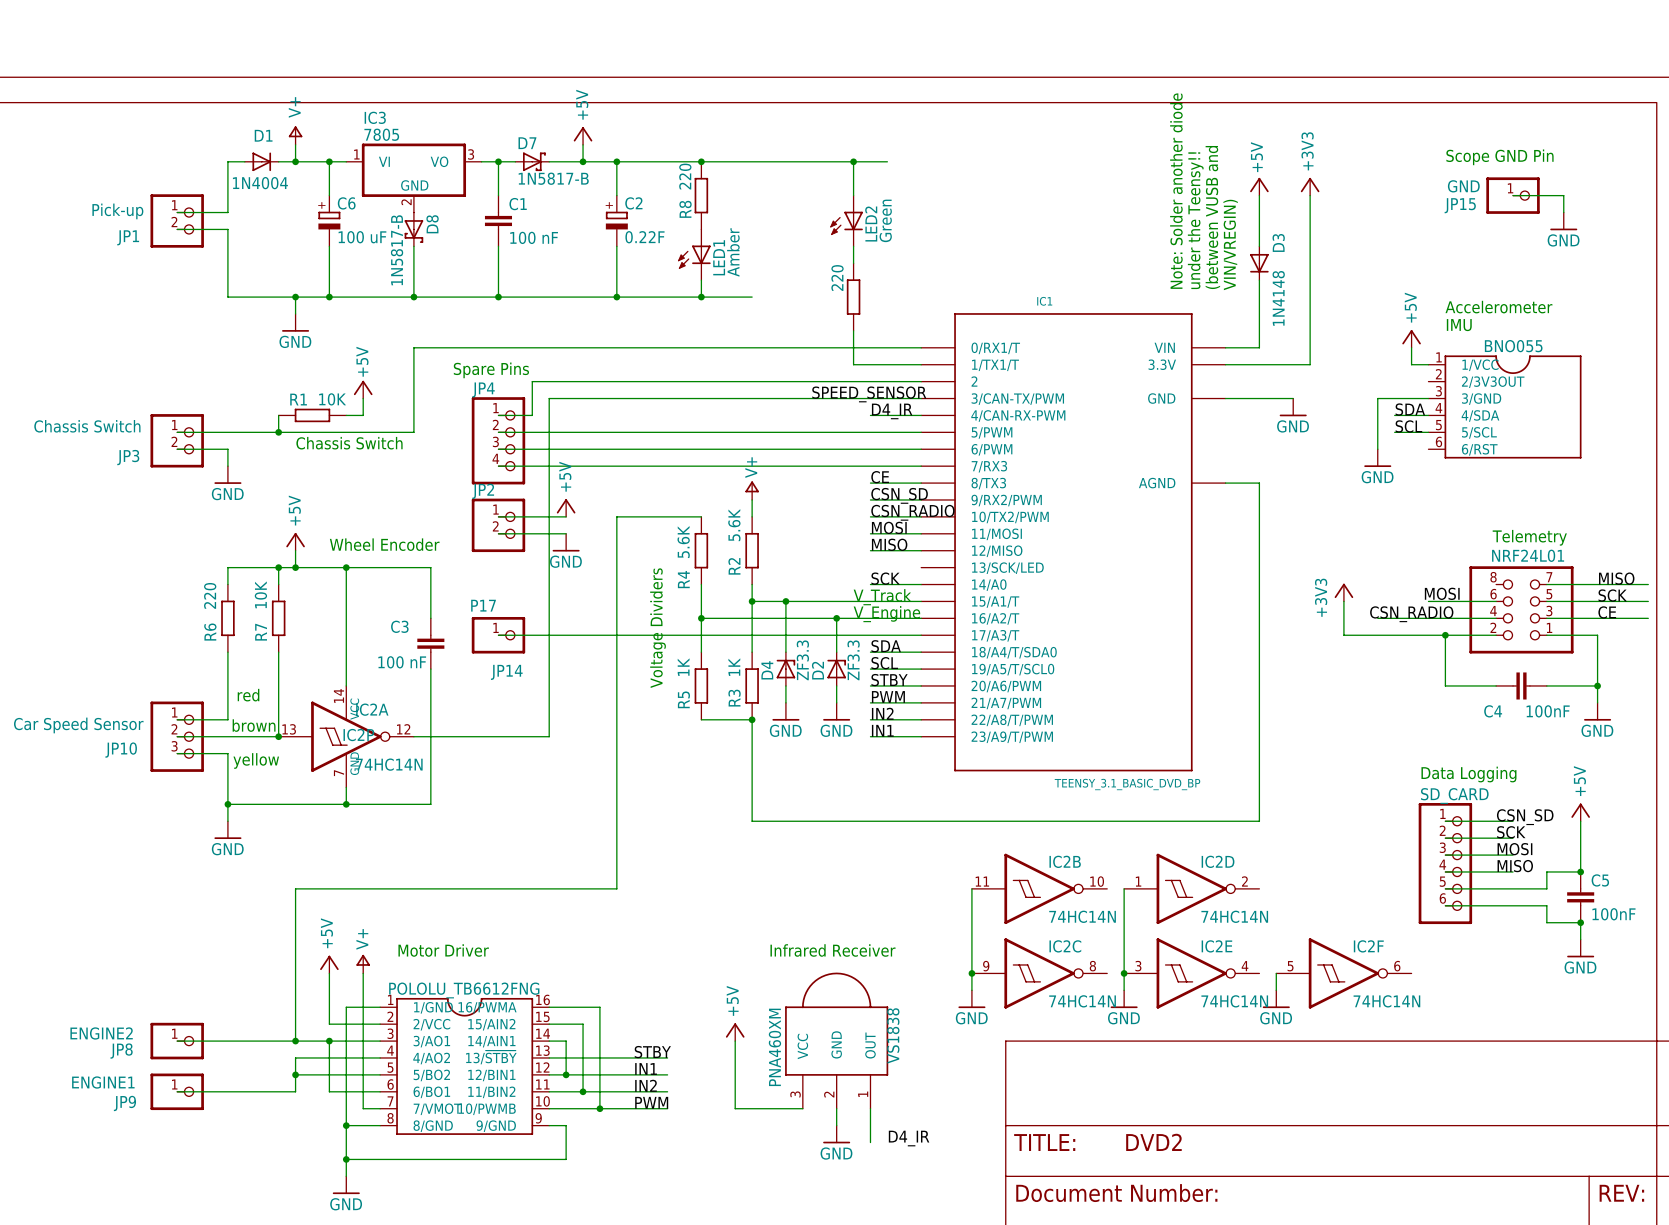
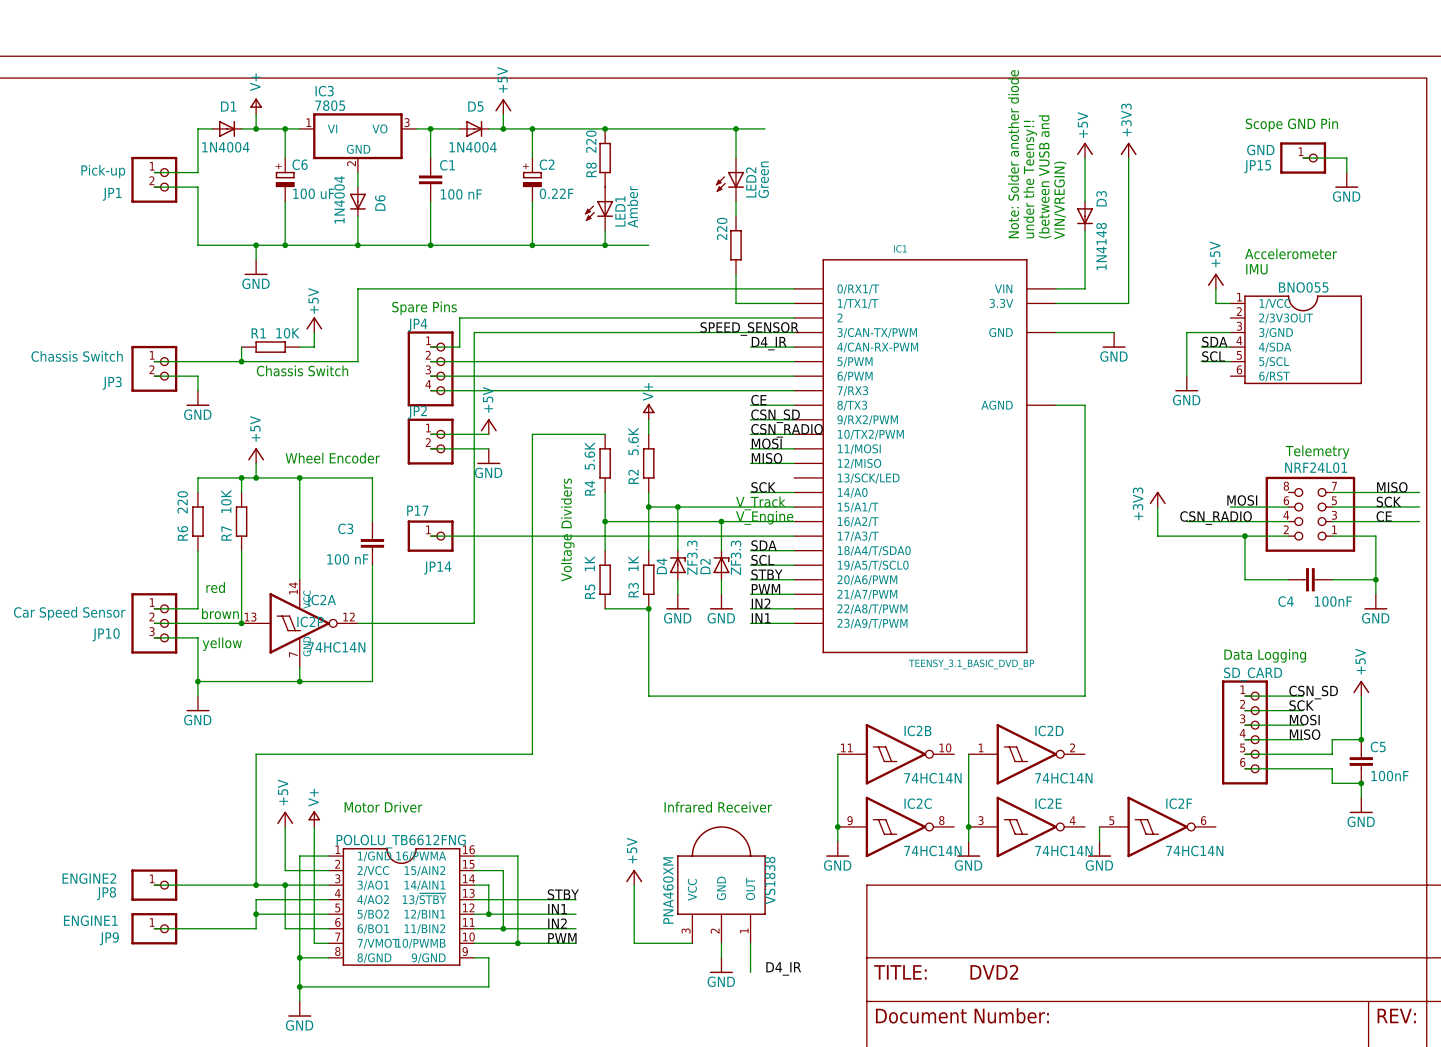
D7: 1N5817-B (532, 161) -> none
D5: none -> 1N4004 (474, 128)
D8: 1N5817-B (413, 229) -> none
D6: none -> 1N4004 (357, 201)

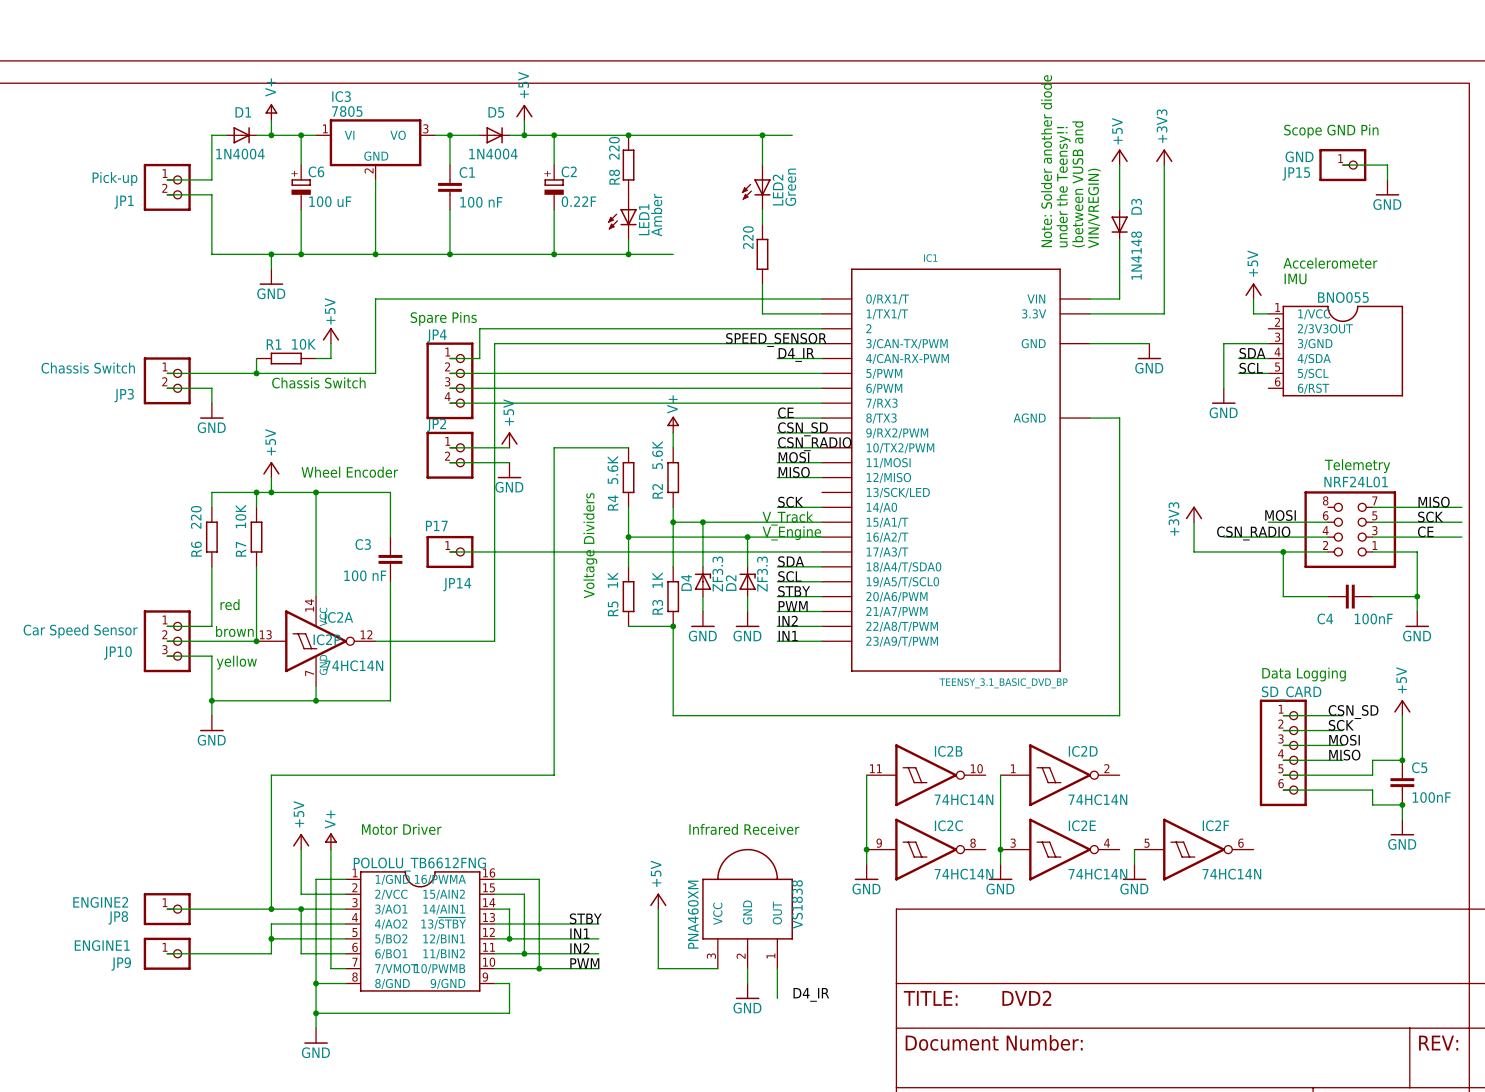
D6: 1N4004 (357, 201) -> none

